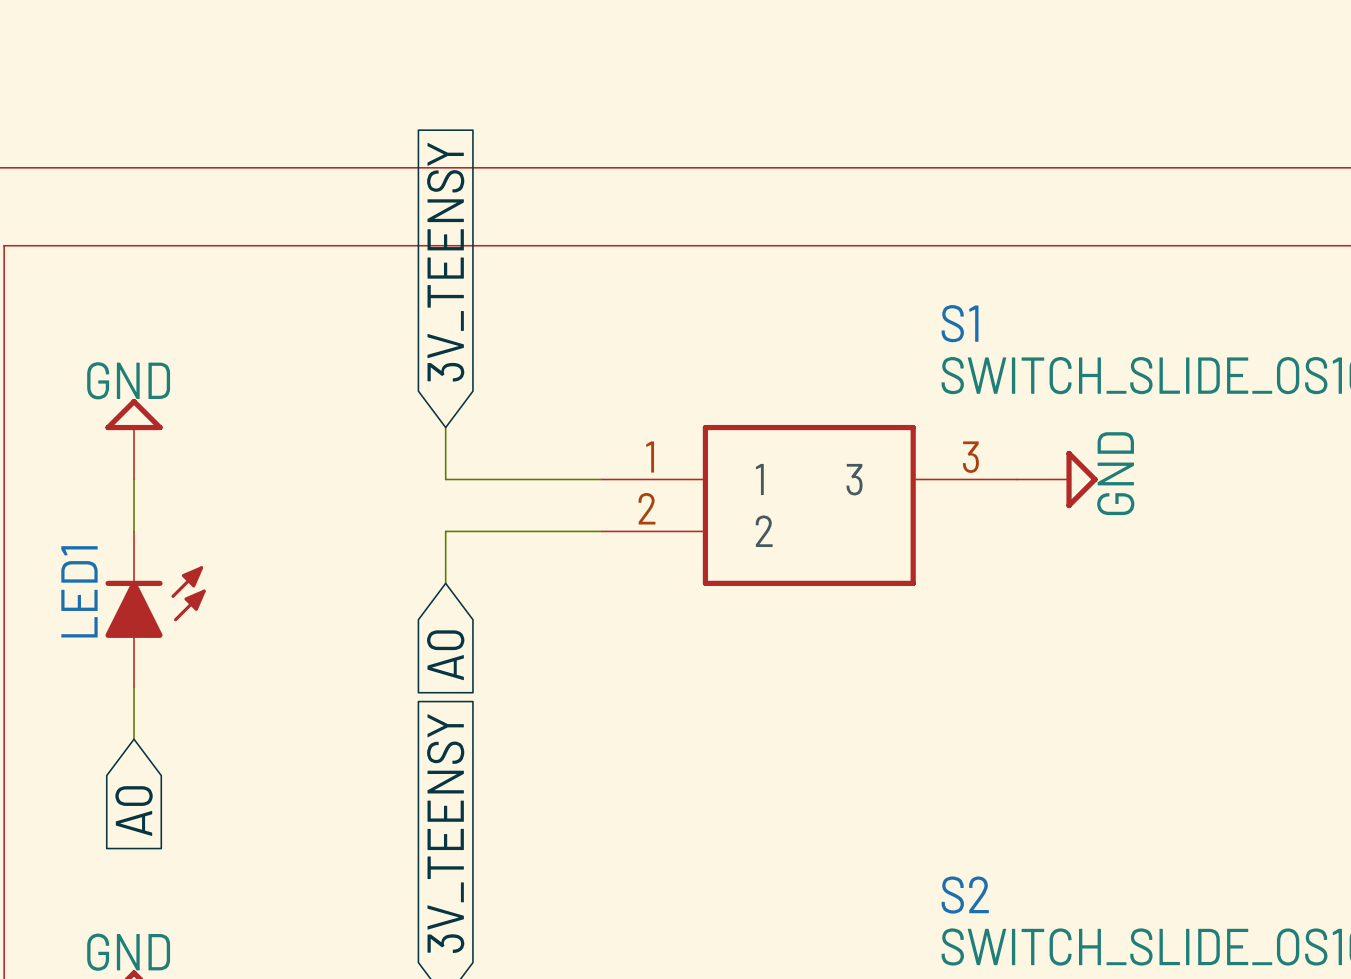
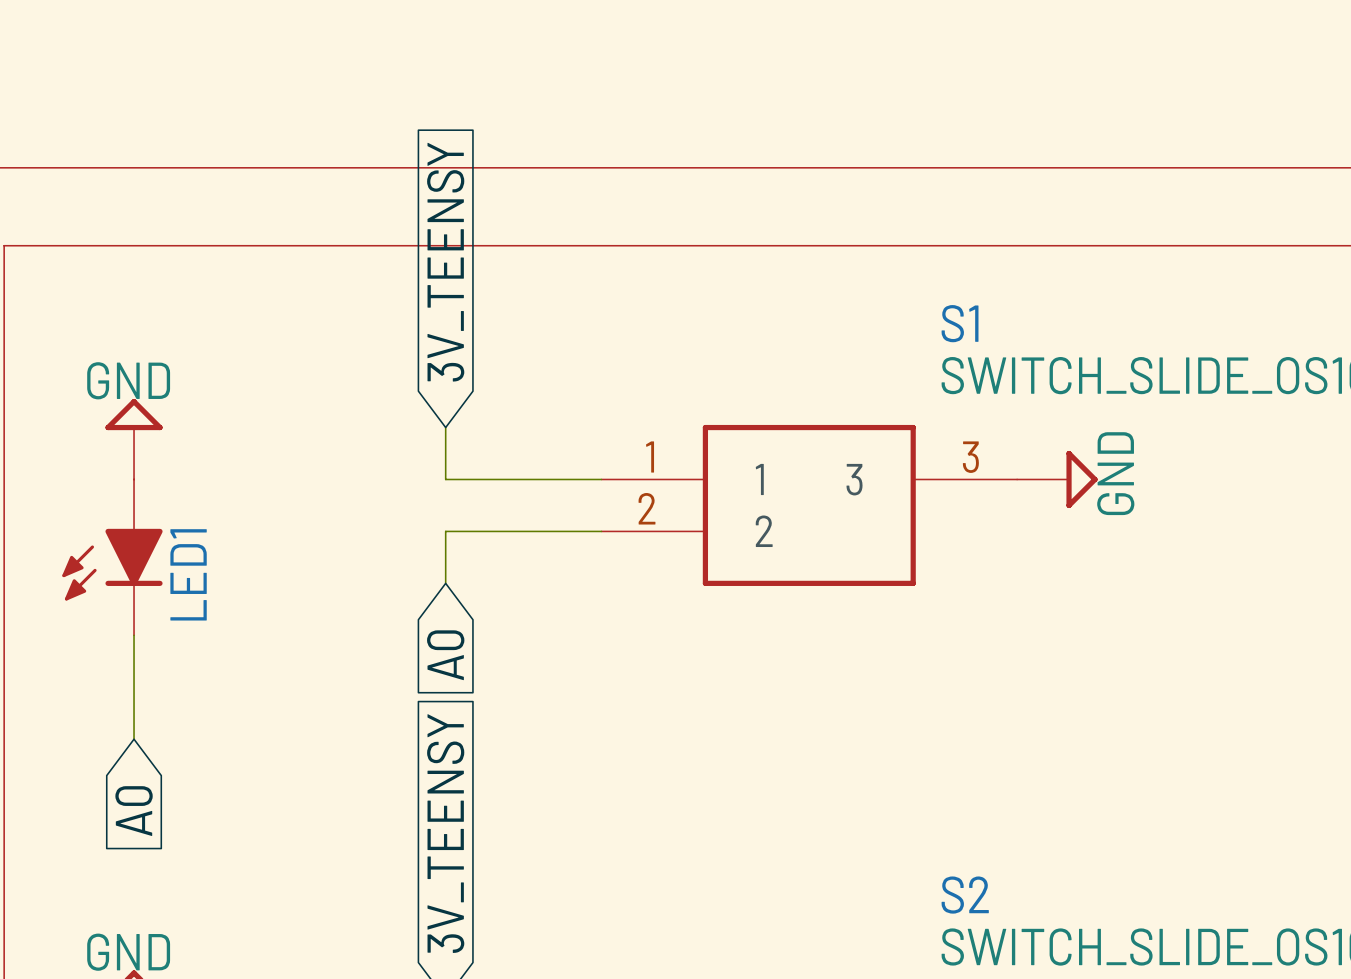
LED1 rotation: 0° (155, 602) -> 180° (112, 564)

